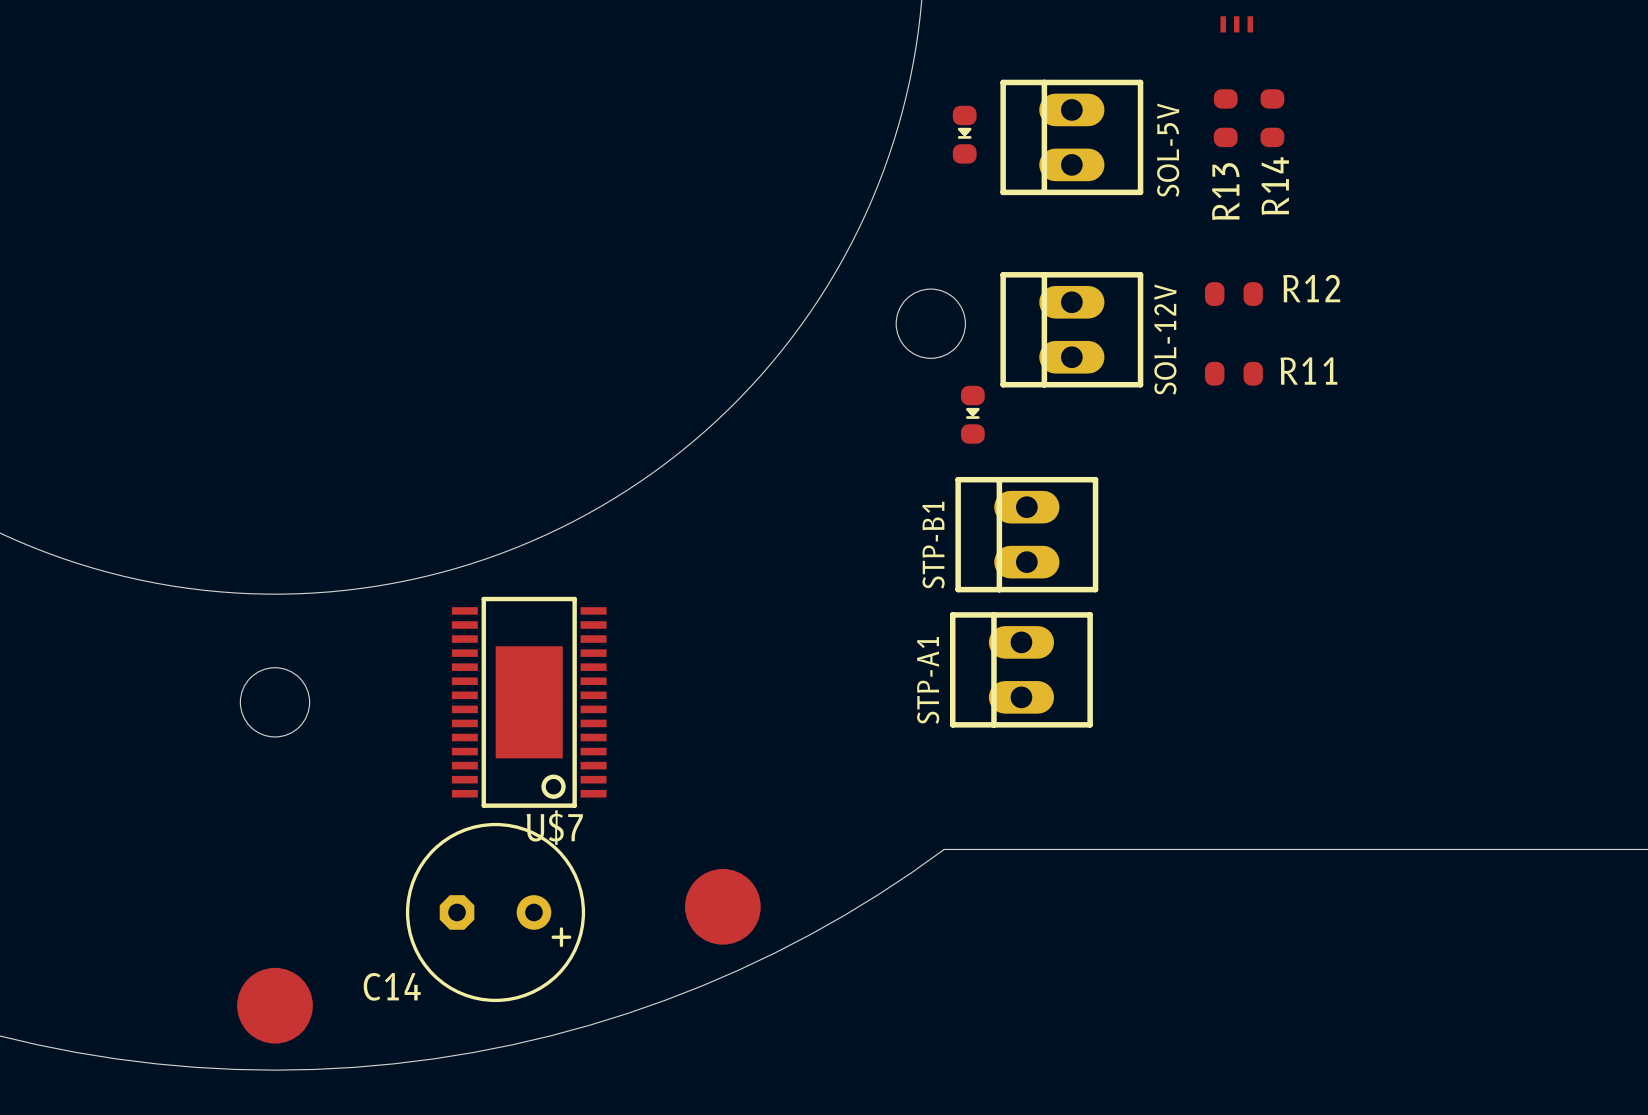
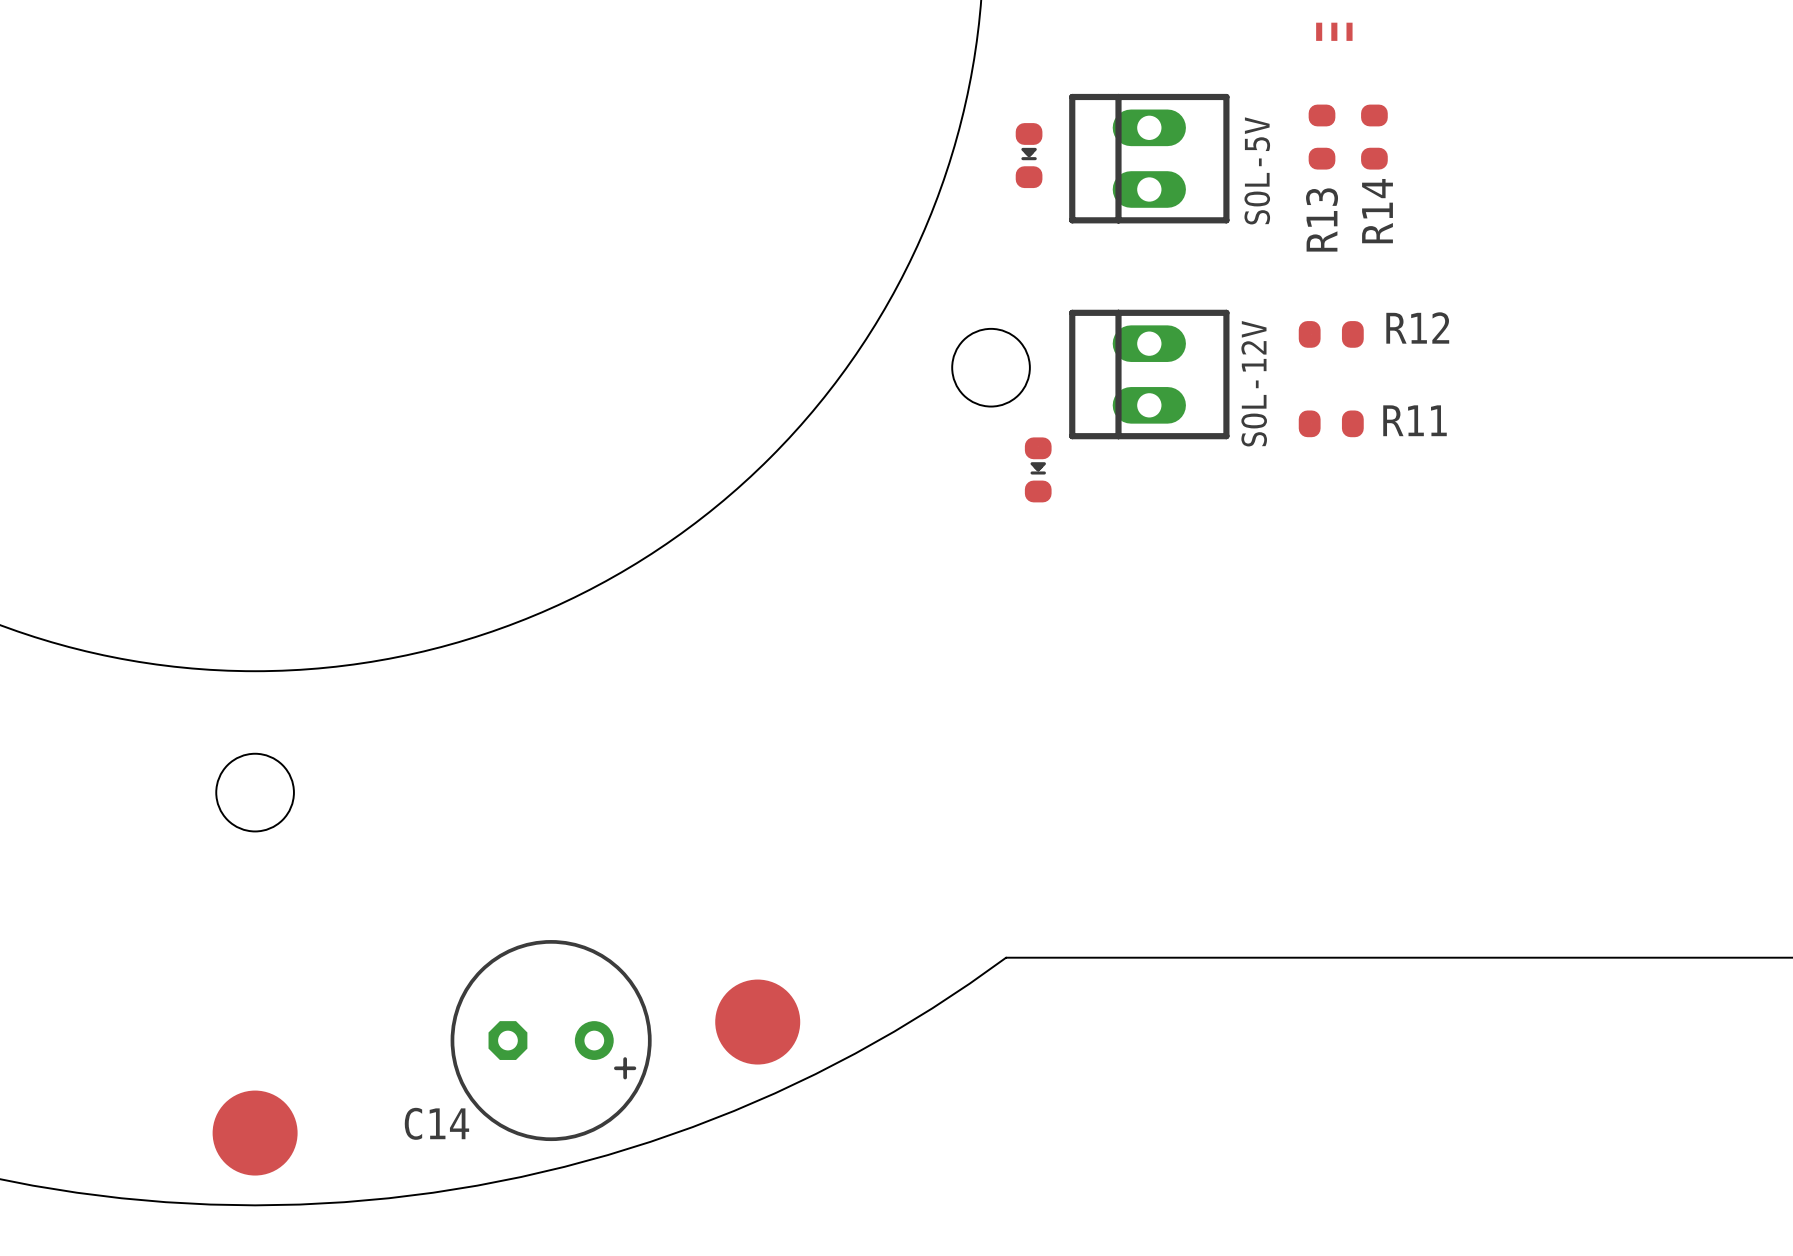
STP-B1: (1026, 534) -> none
STP-A1: (1021, 669) -> none
U$7: (529, 702) -> none
C14 position: (495, 912) -> (551, 1040)

